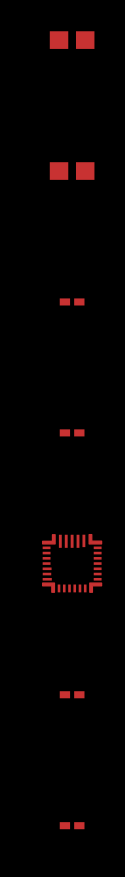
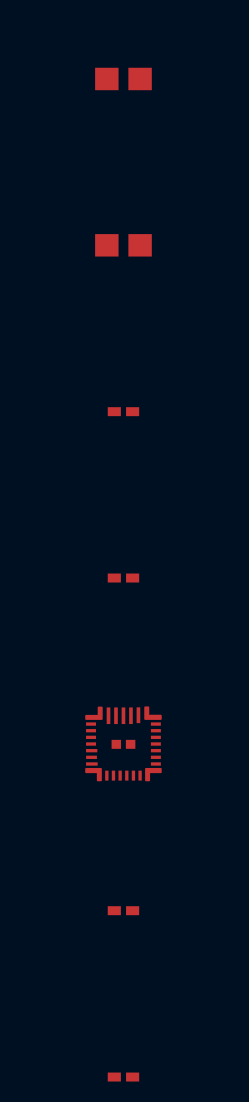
part: none -> (123, 744)

